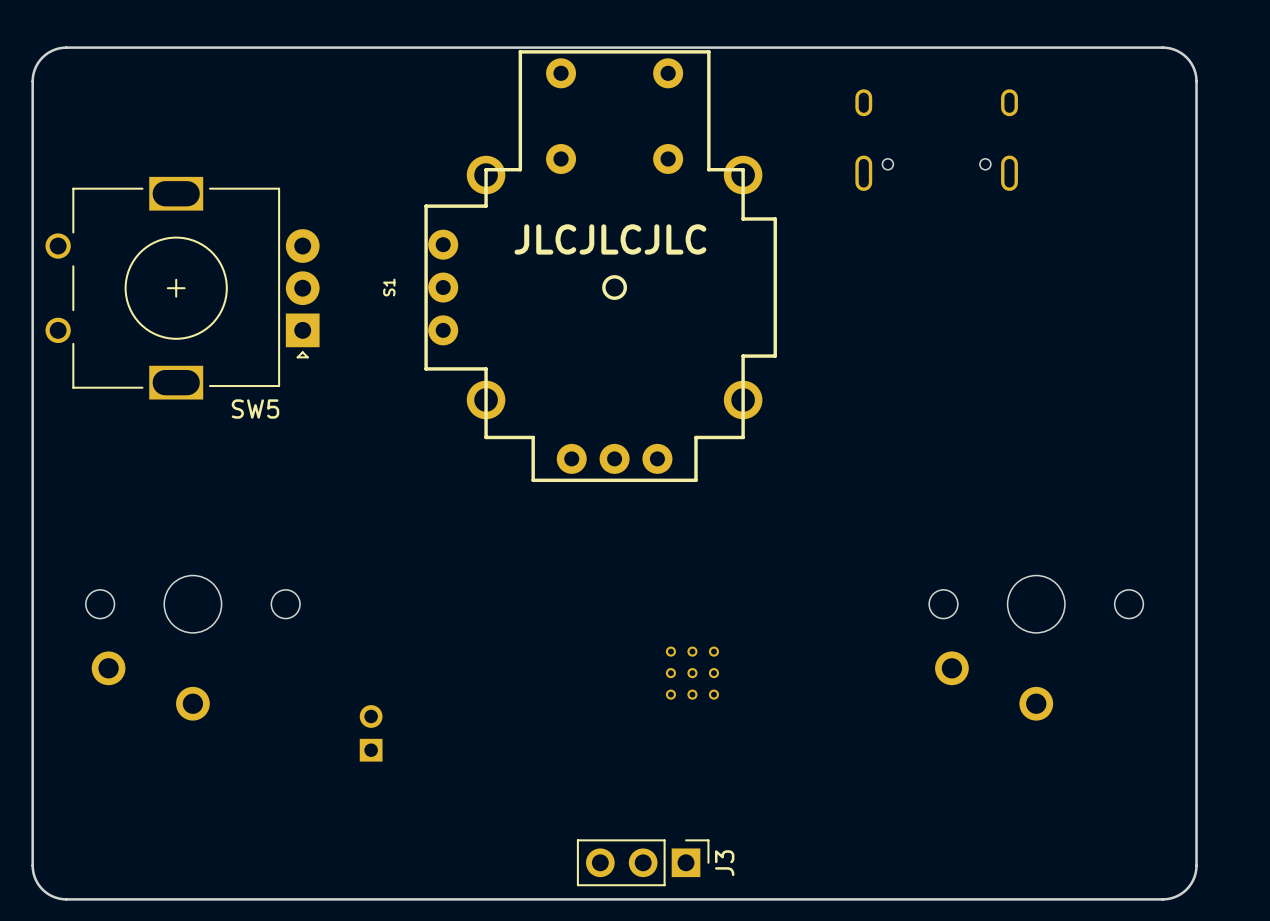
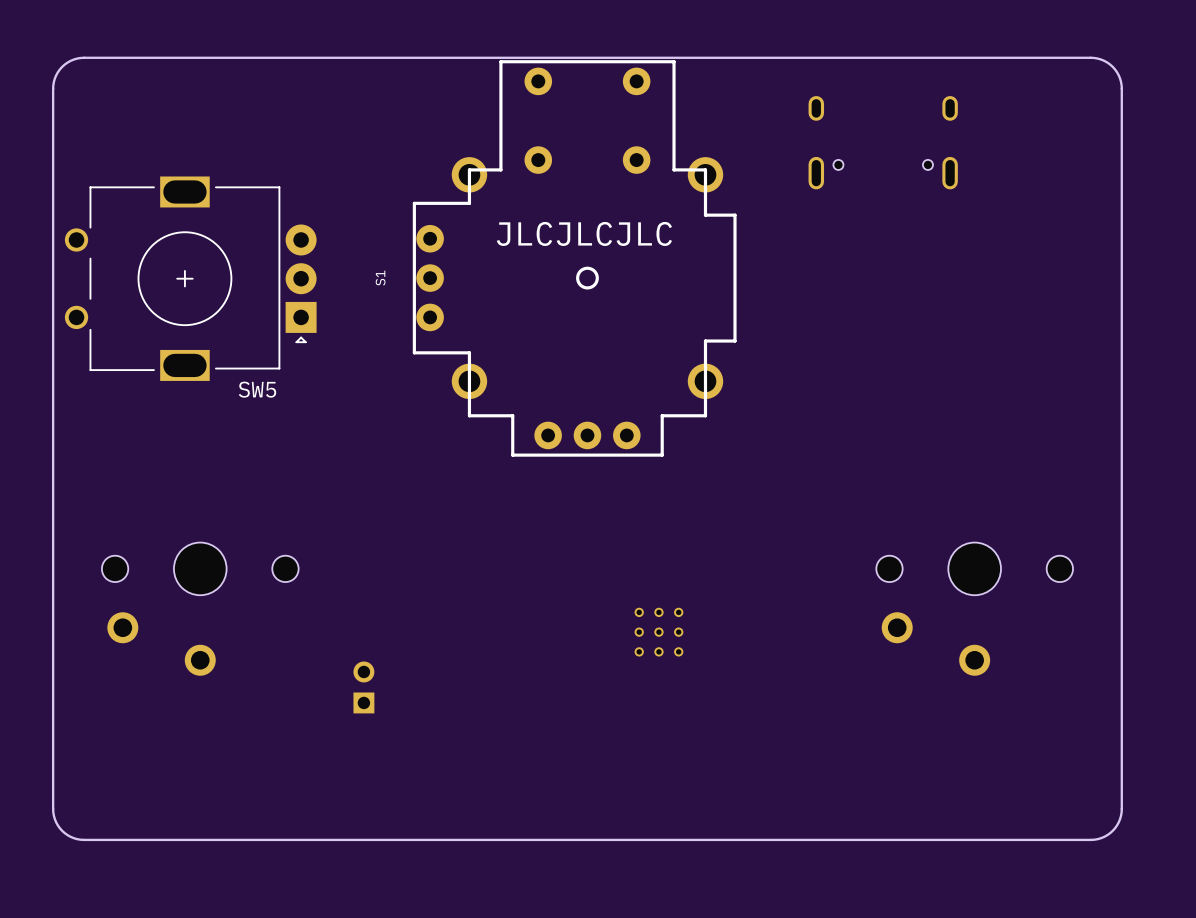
J3: (643, 862) -> none

